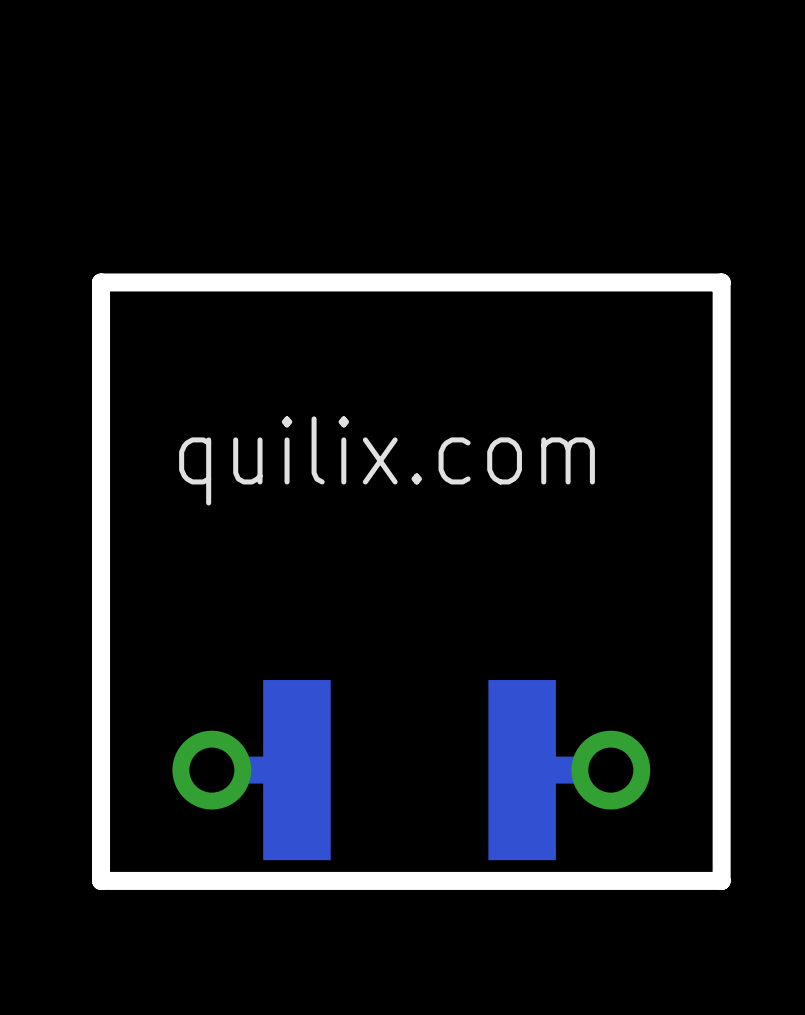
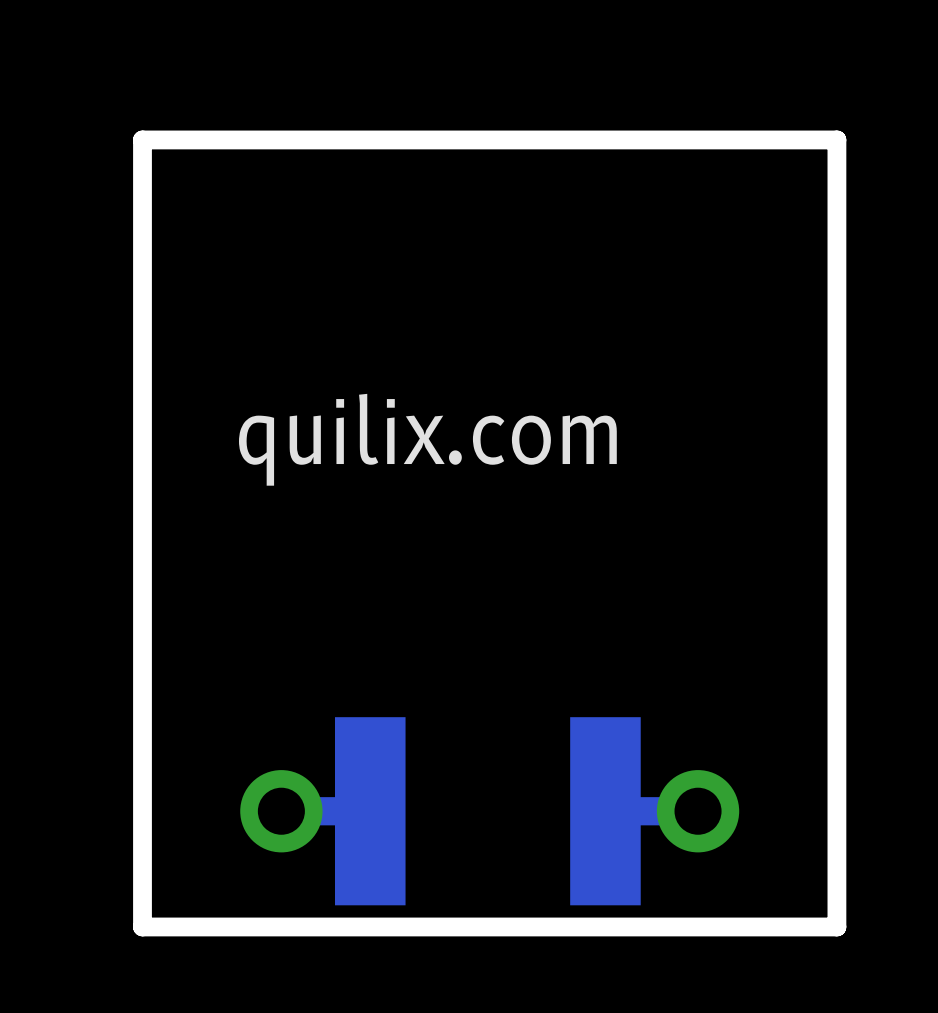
text position: quilix.com (387, 460) -> quilix.com (427, 439)
board edge: (721, 880) (721, 282) (101, 282) (101, 880) -> (813, 926) (836, 926) (836, 139) (142, 139) (142, 926) (165, 926)

